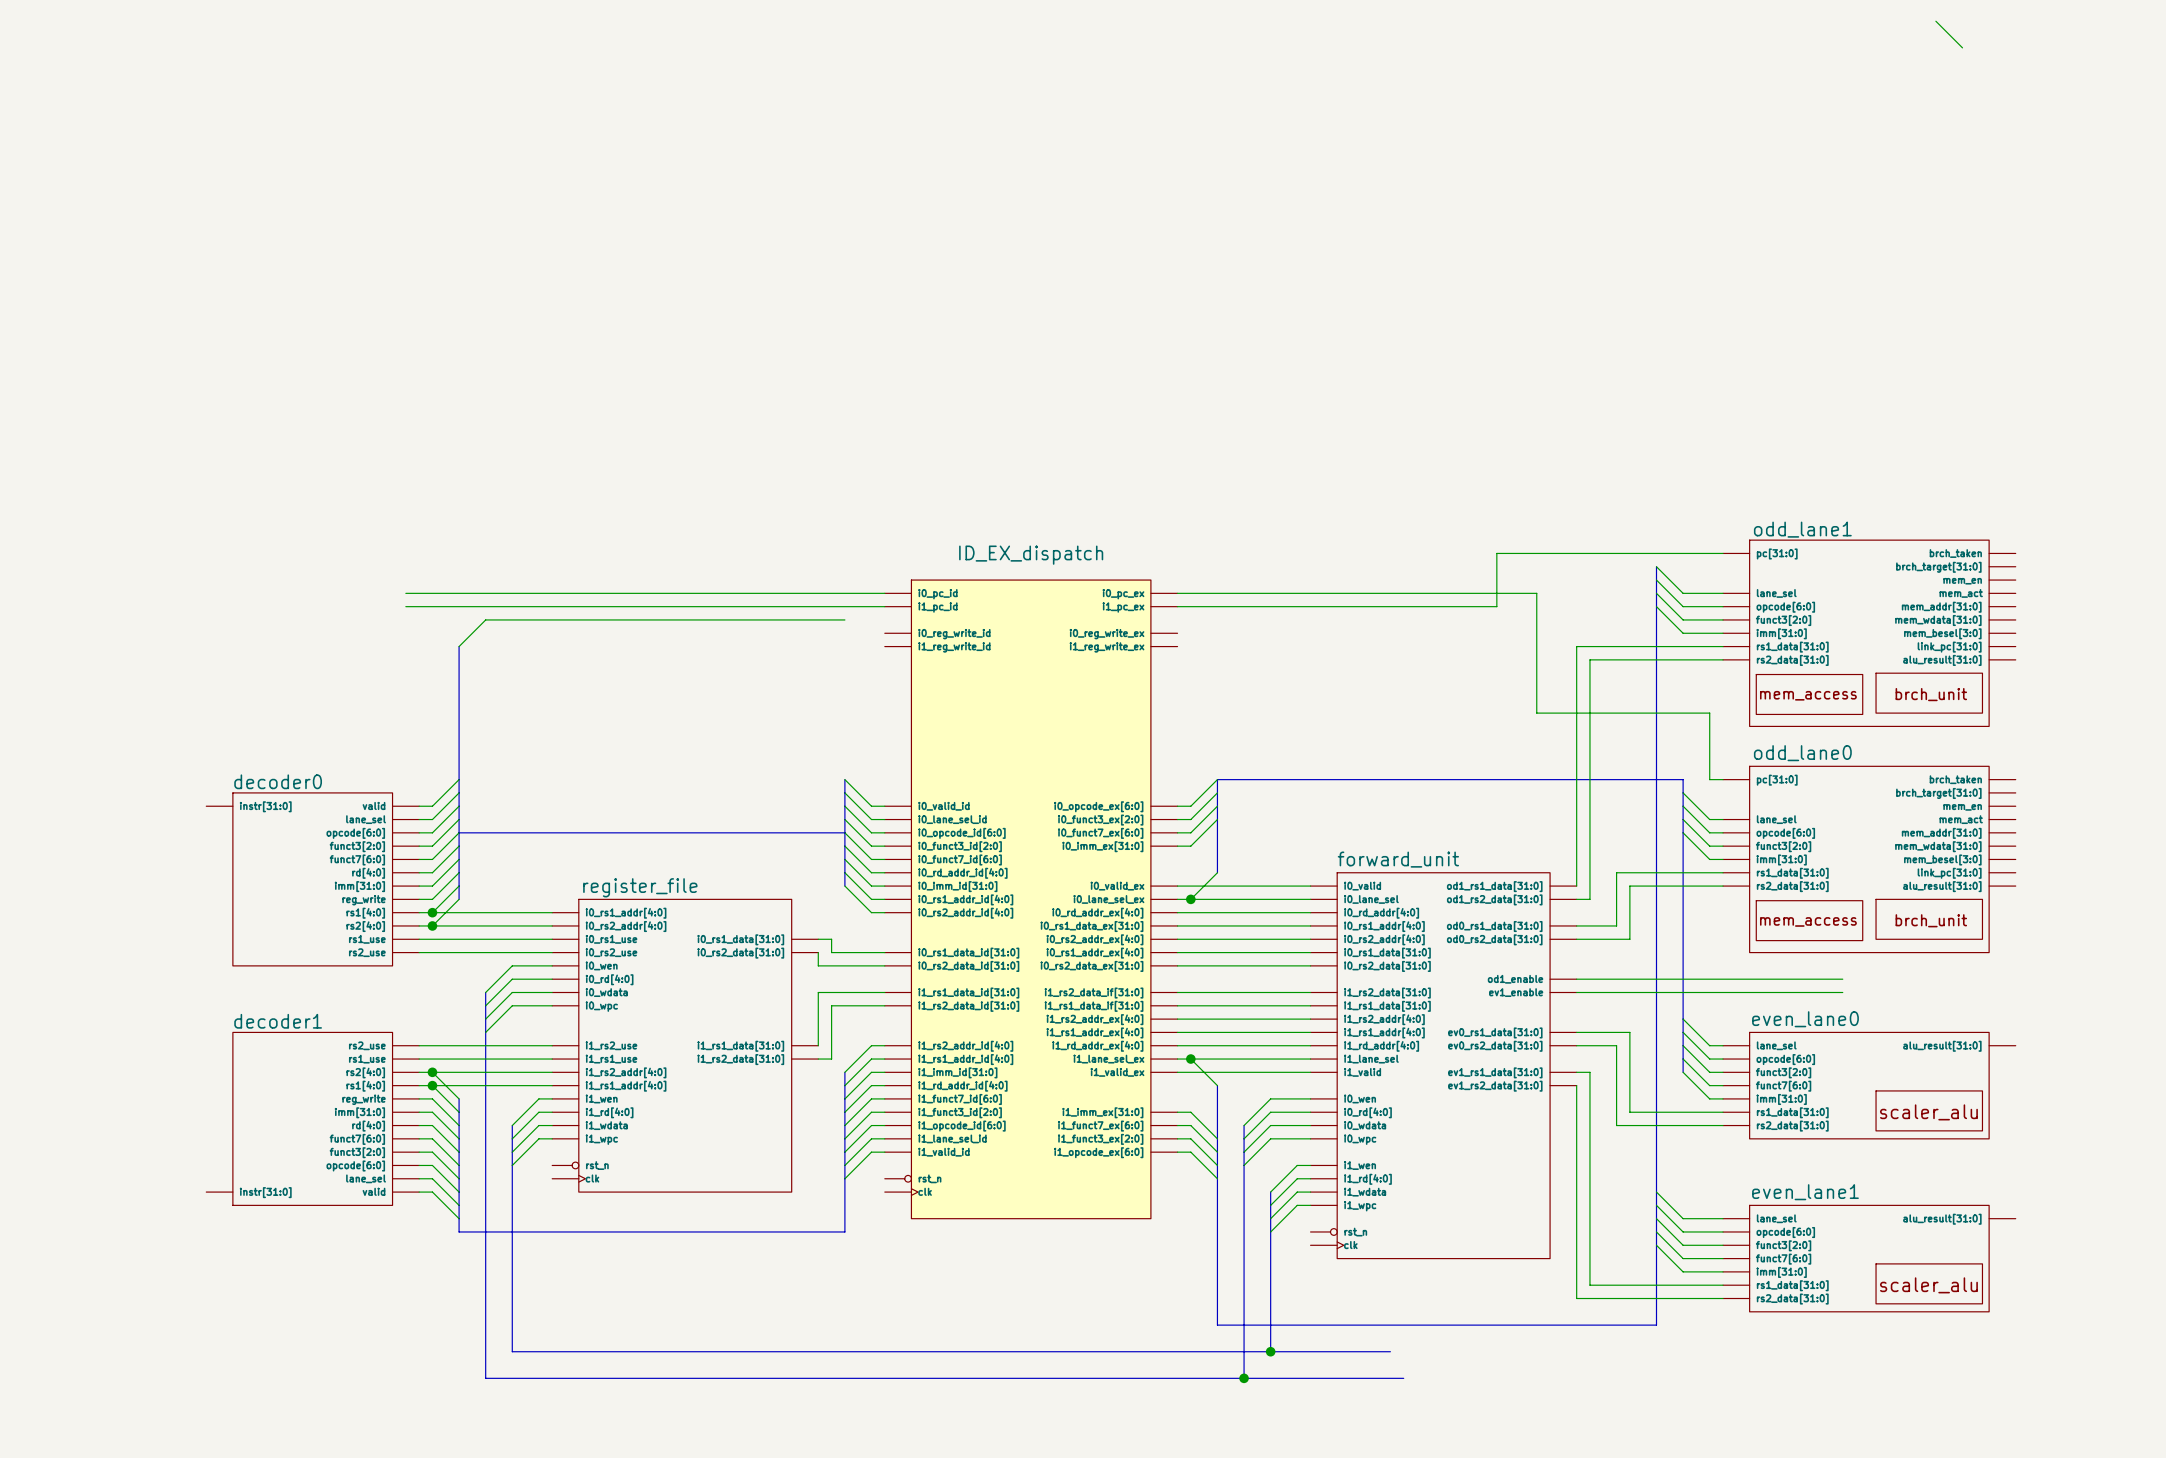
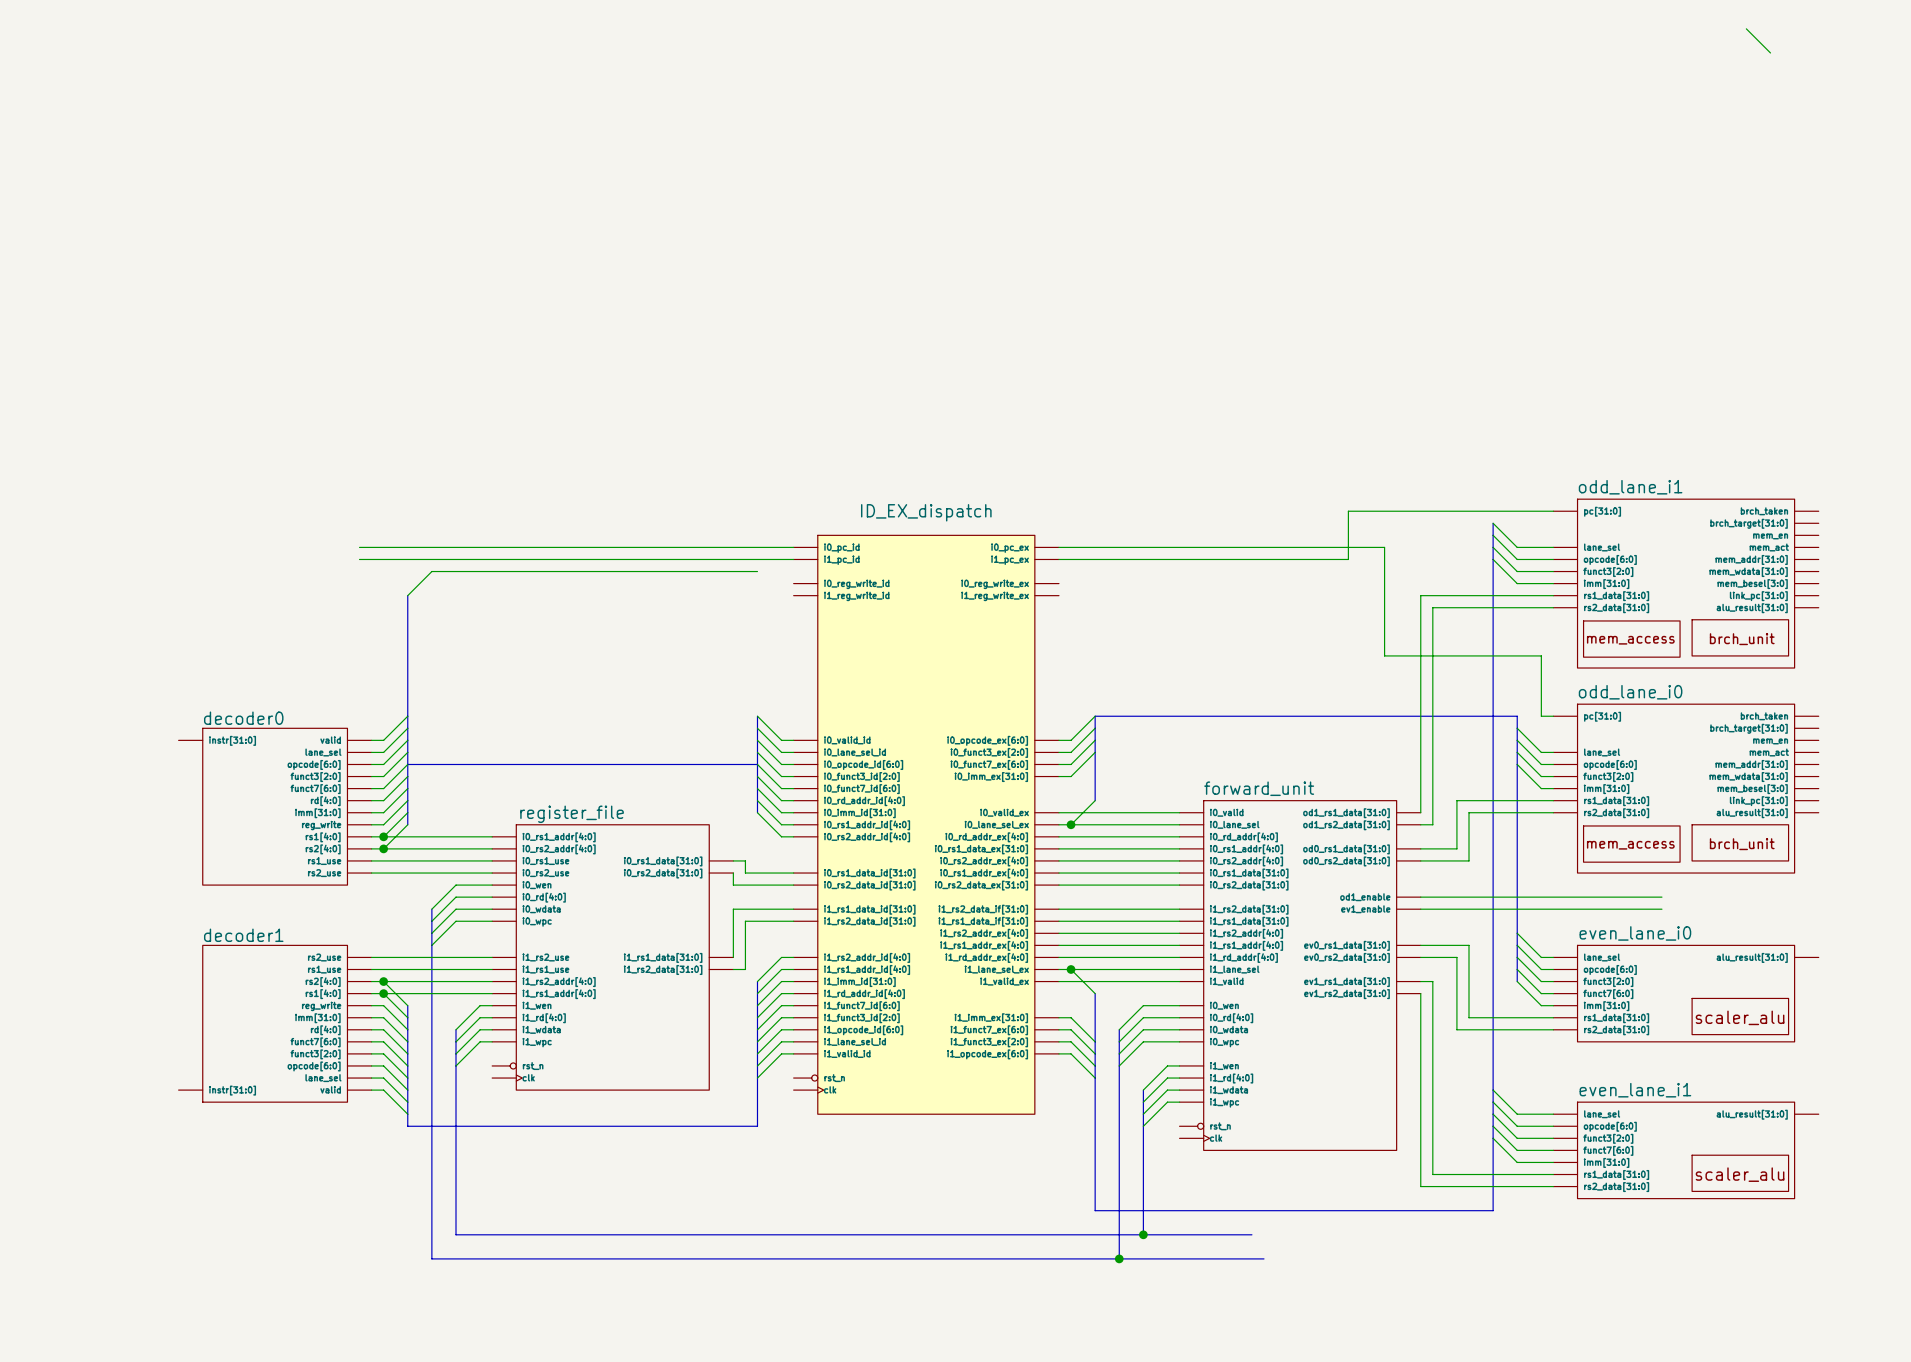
odd_lane1 name: odd_lane1 (1802, 529) -> odd_lane_i1 (1630, 487)
odd_lane0 name: odd_lane0 (1802, 753) -> odd_lane_i0 (1630, 692)
even_lane0 name: even_lane0 (1805, 1019) -> even_lane_i0 (1635, 933)
even_lane1 name: even_lane1 (1805, 1192) -> even_lane_i1 (1635, 1090)

